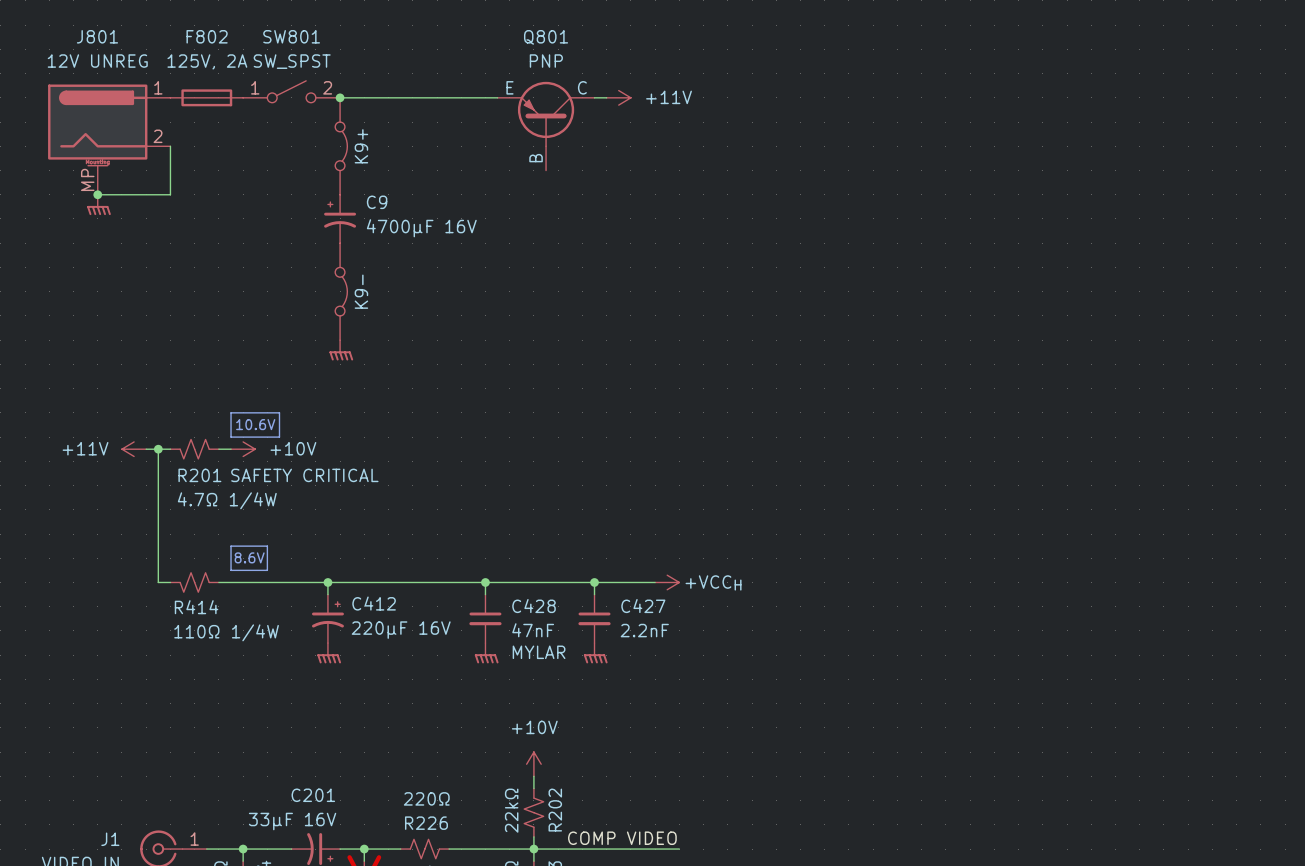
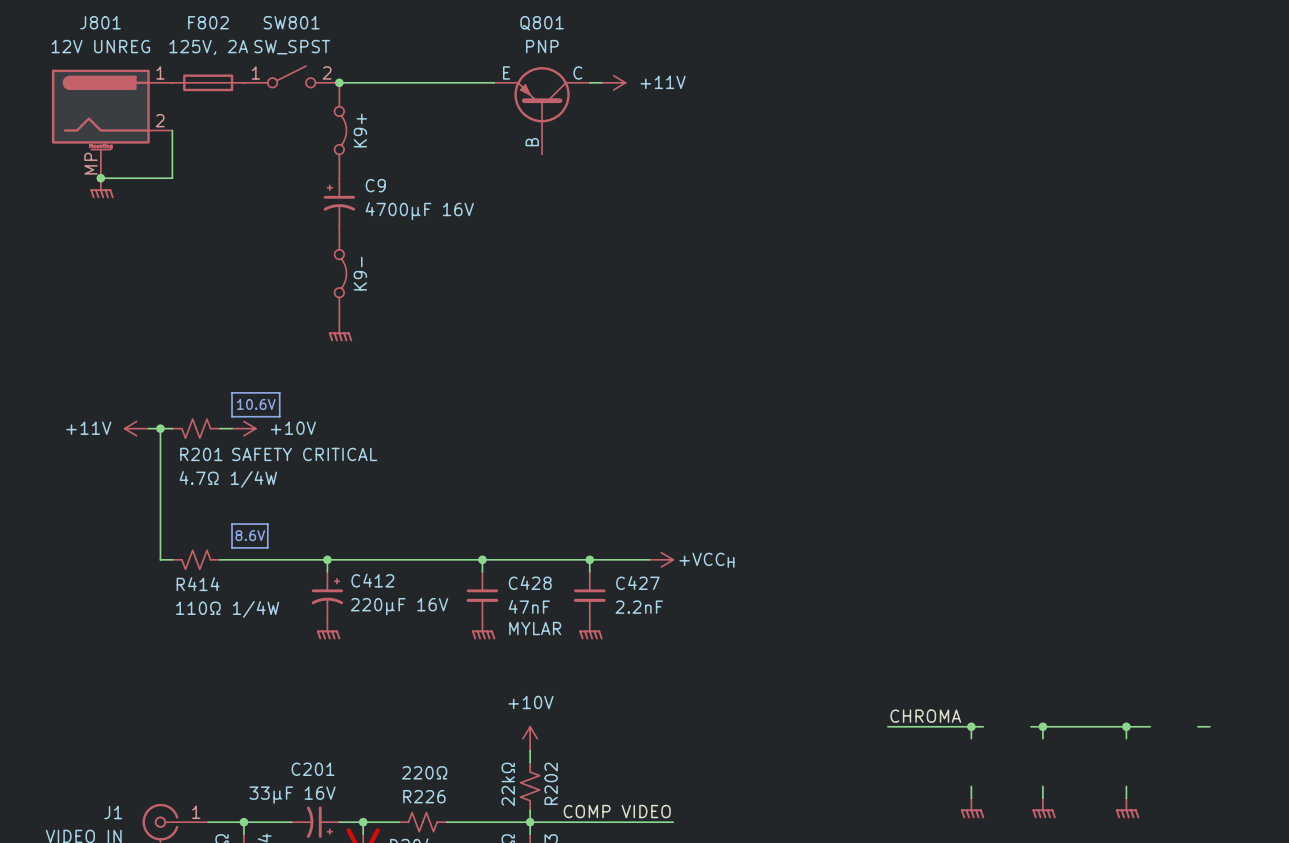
label: none -> CHROMA (925, 716)
wire: none -> (887, 726) (983, 726)
wire: none -> (971, 726) (971, 738)
junction: none -> (971, 726)
wire: none -> (1031, 726) (1150, 726)
wire: none -> (1042, 726) (1042, 738)
junction: none -> (1042, 726)
wire: none -> (1126, 726) (1126, 738)
junction: none -> (1126, 726)
wire: none -> (1197, 726) (1209, 726)
wire: none -> (971, 786) (971, 798)
wire: none -> (1042, 786) (1042, 798)
wire: none -> (1126, 786) (1126, 798)
power symbol: none -> (972, 808)
power symbol: none -> (1044, 808)
power symbol: none -> (1127, 808)

